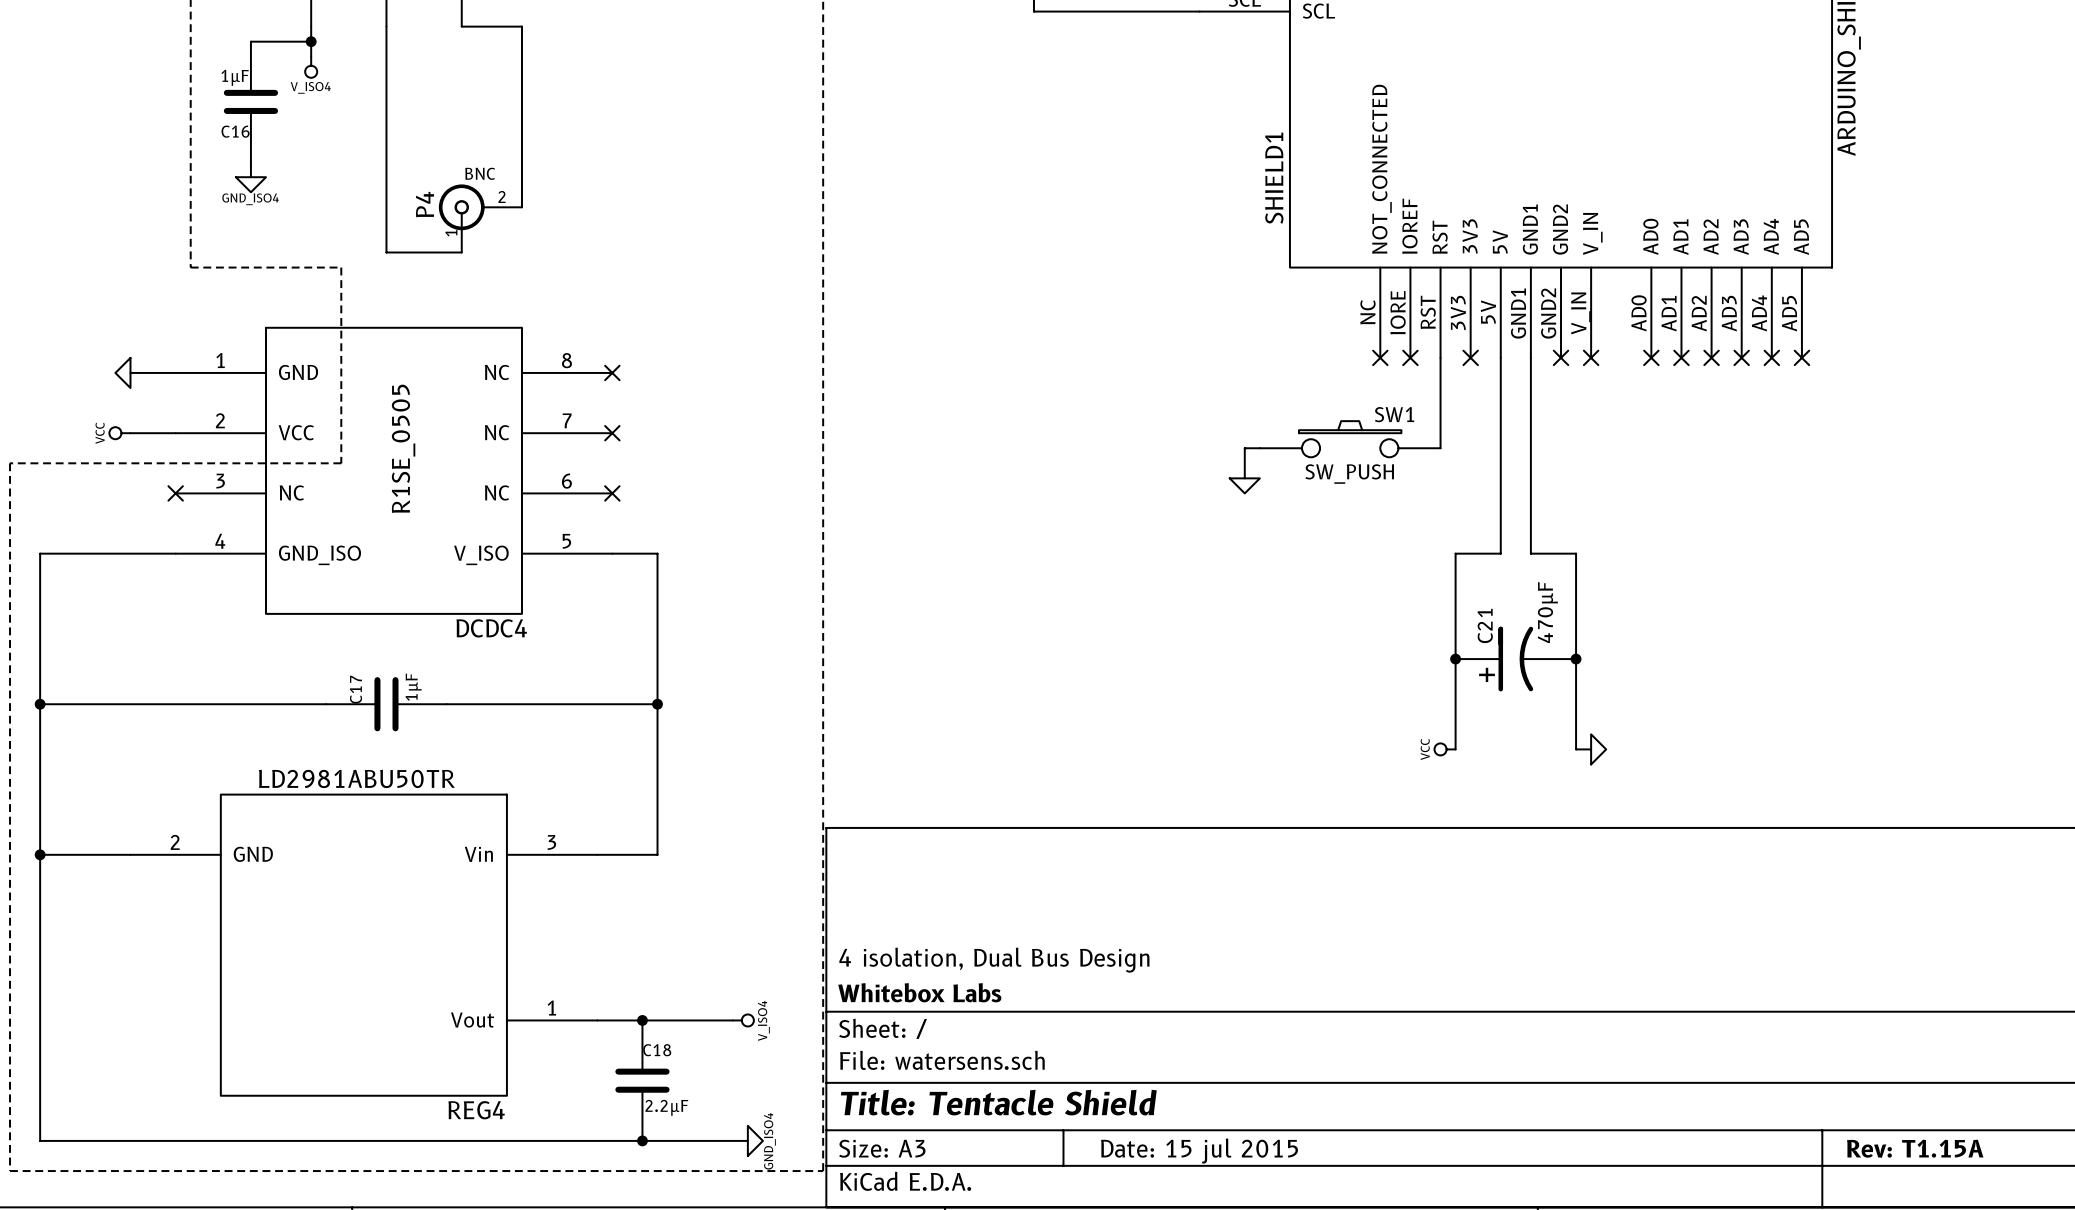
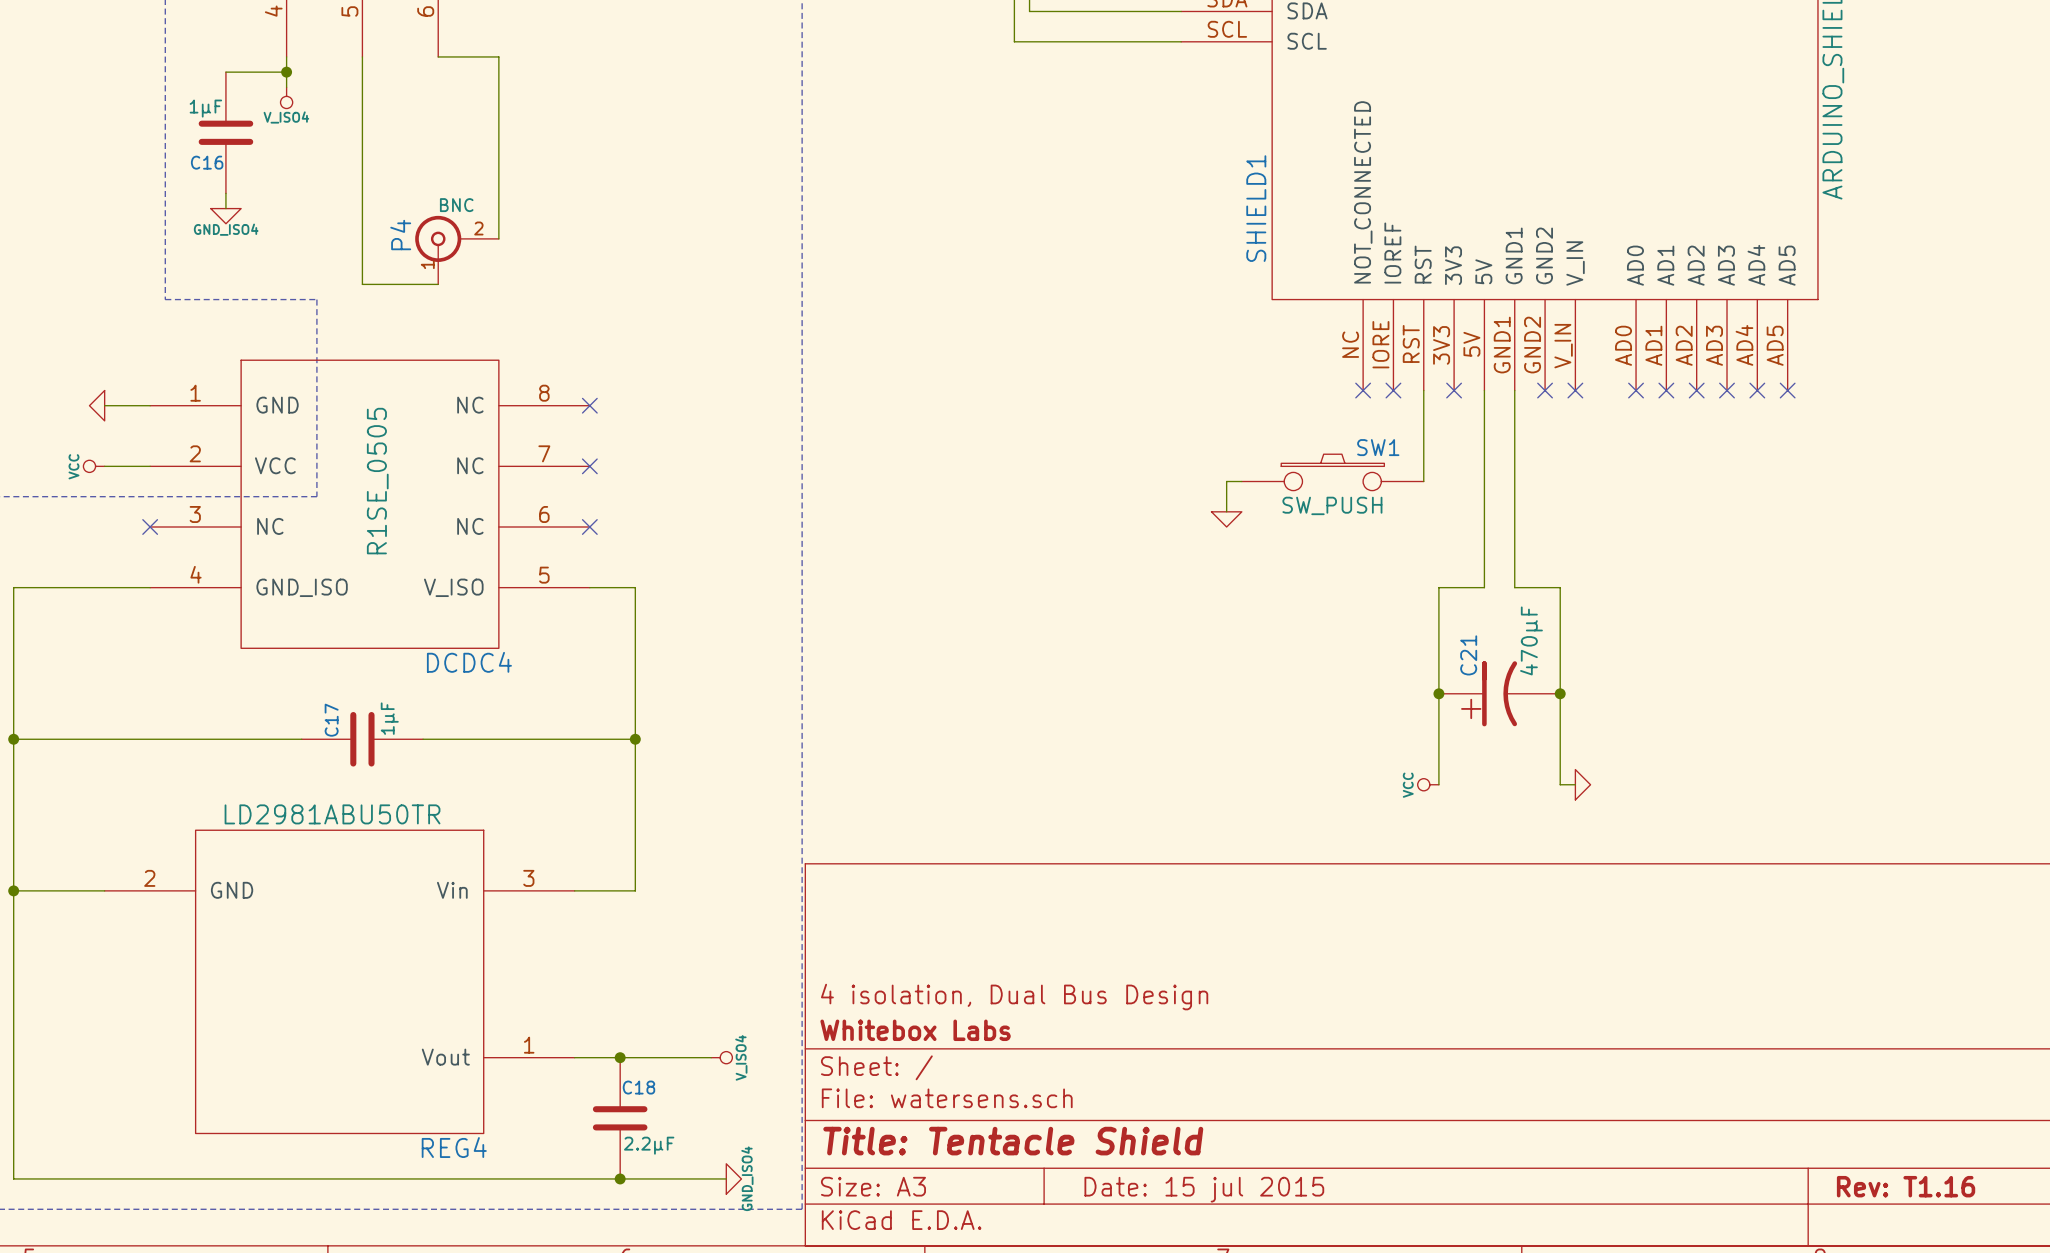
title block: Rev: T1.15A (1915, 1148) -> Rev: T1.16 (1906, 1186)

